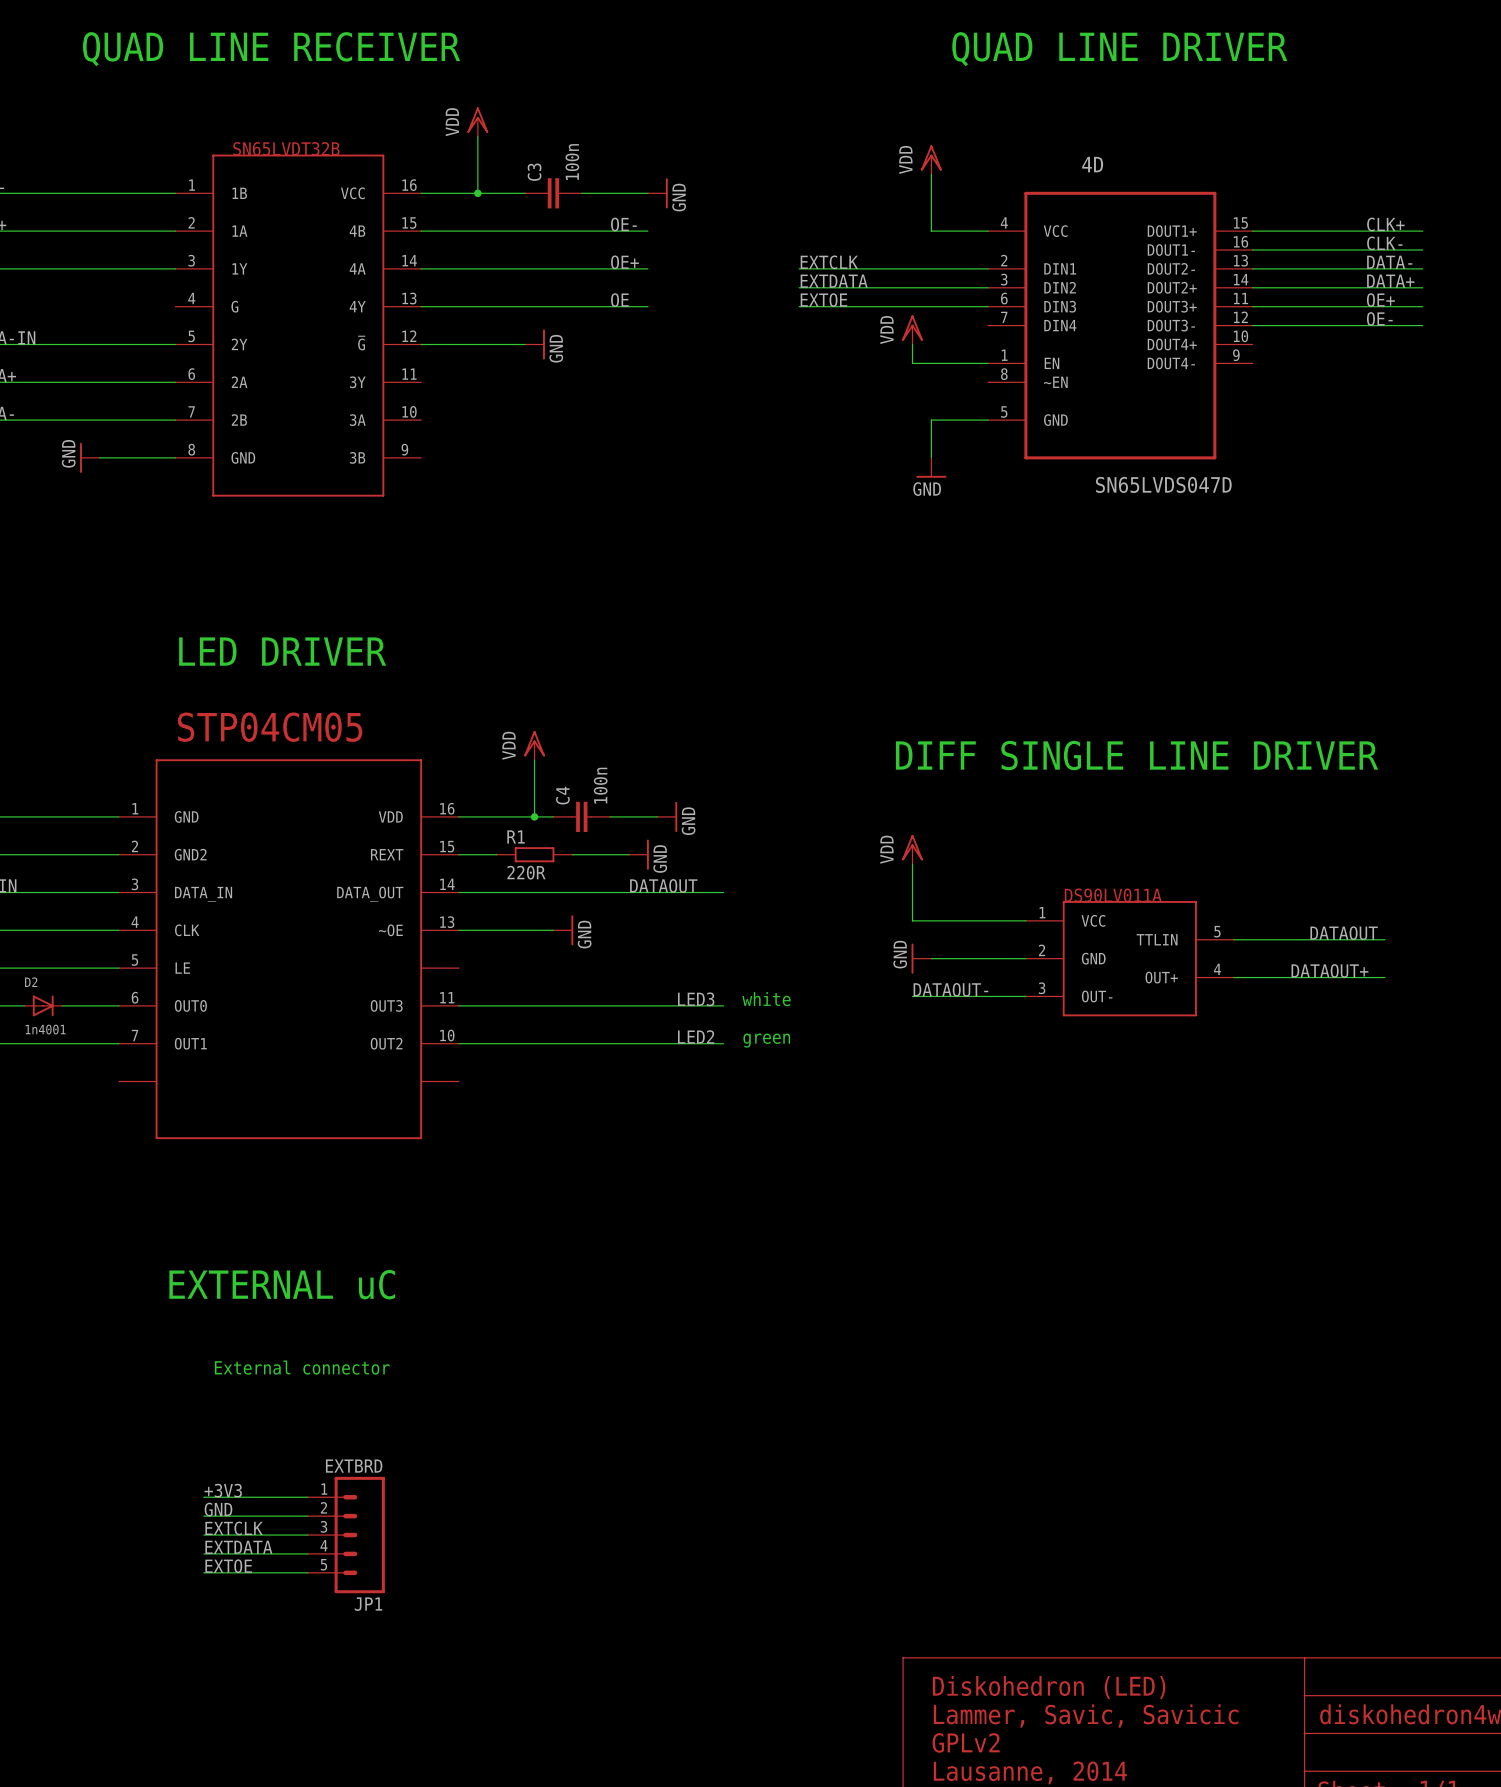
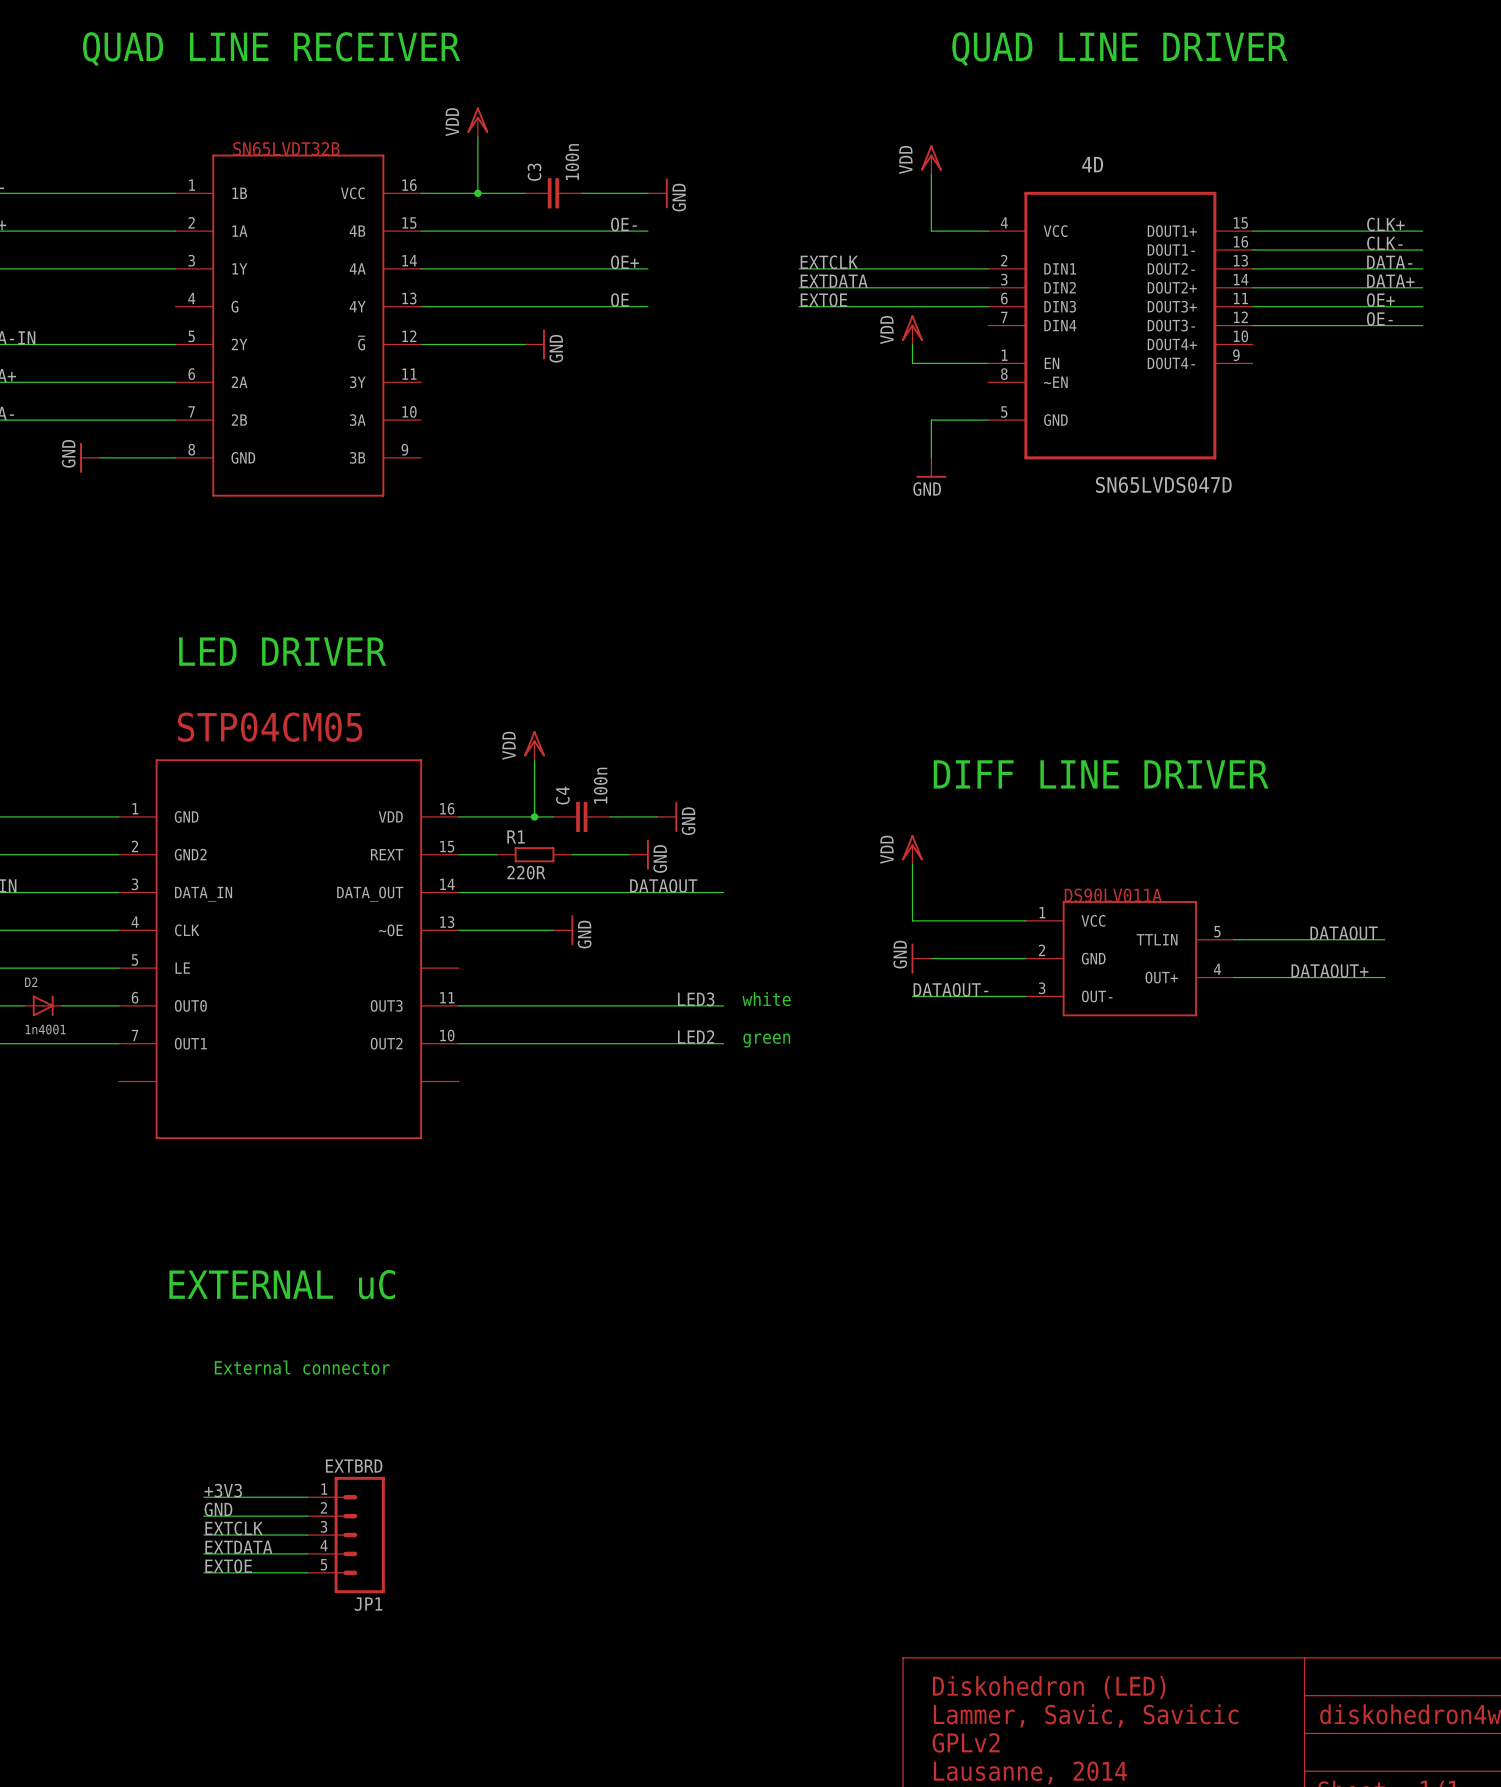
text: DIFF SINGLE LINE DRIVER (1137, 755) -> DIFF LINE DRIVER (1101, 774)

